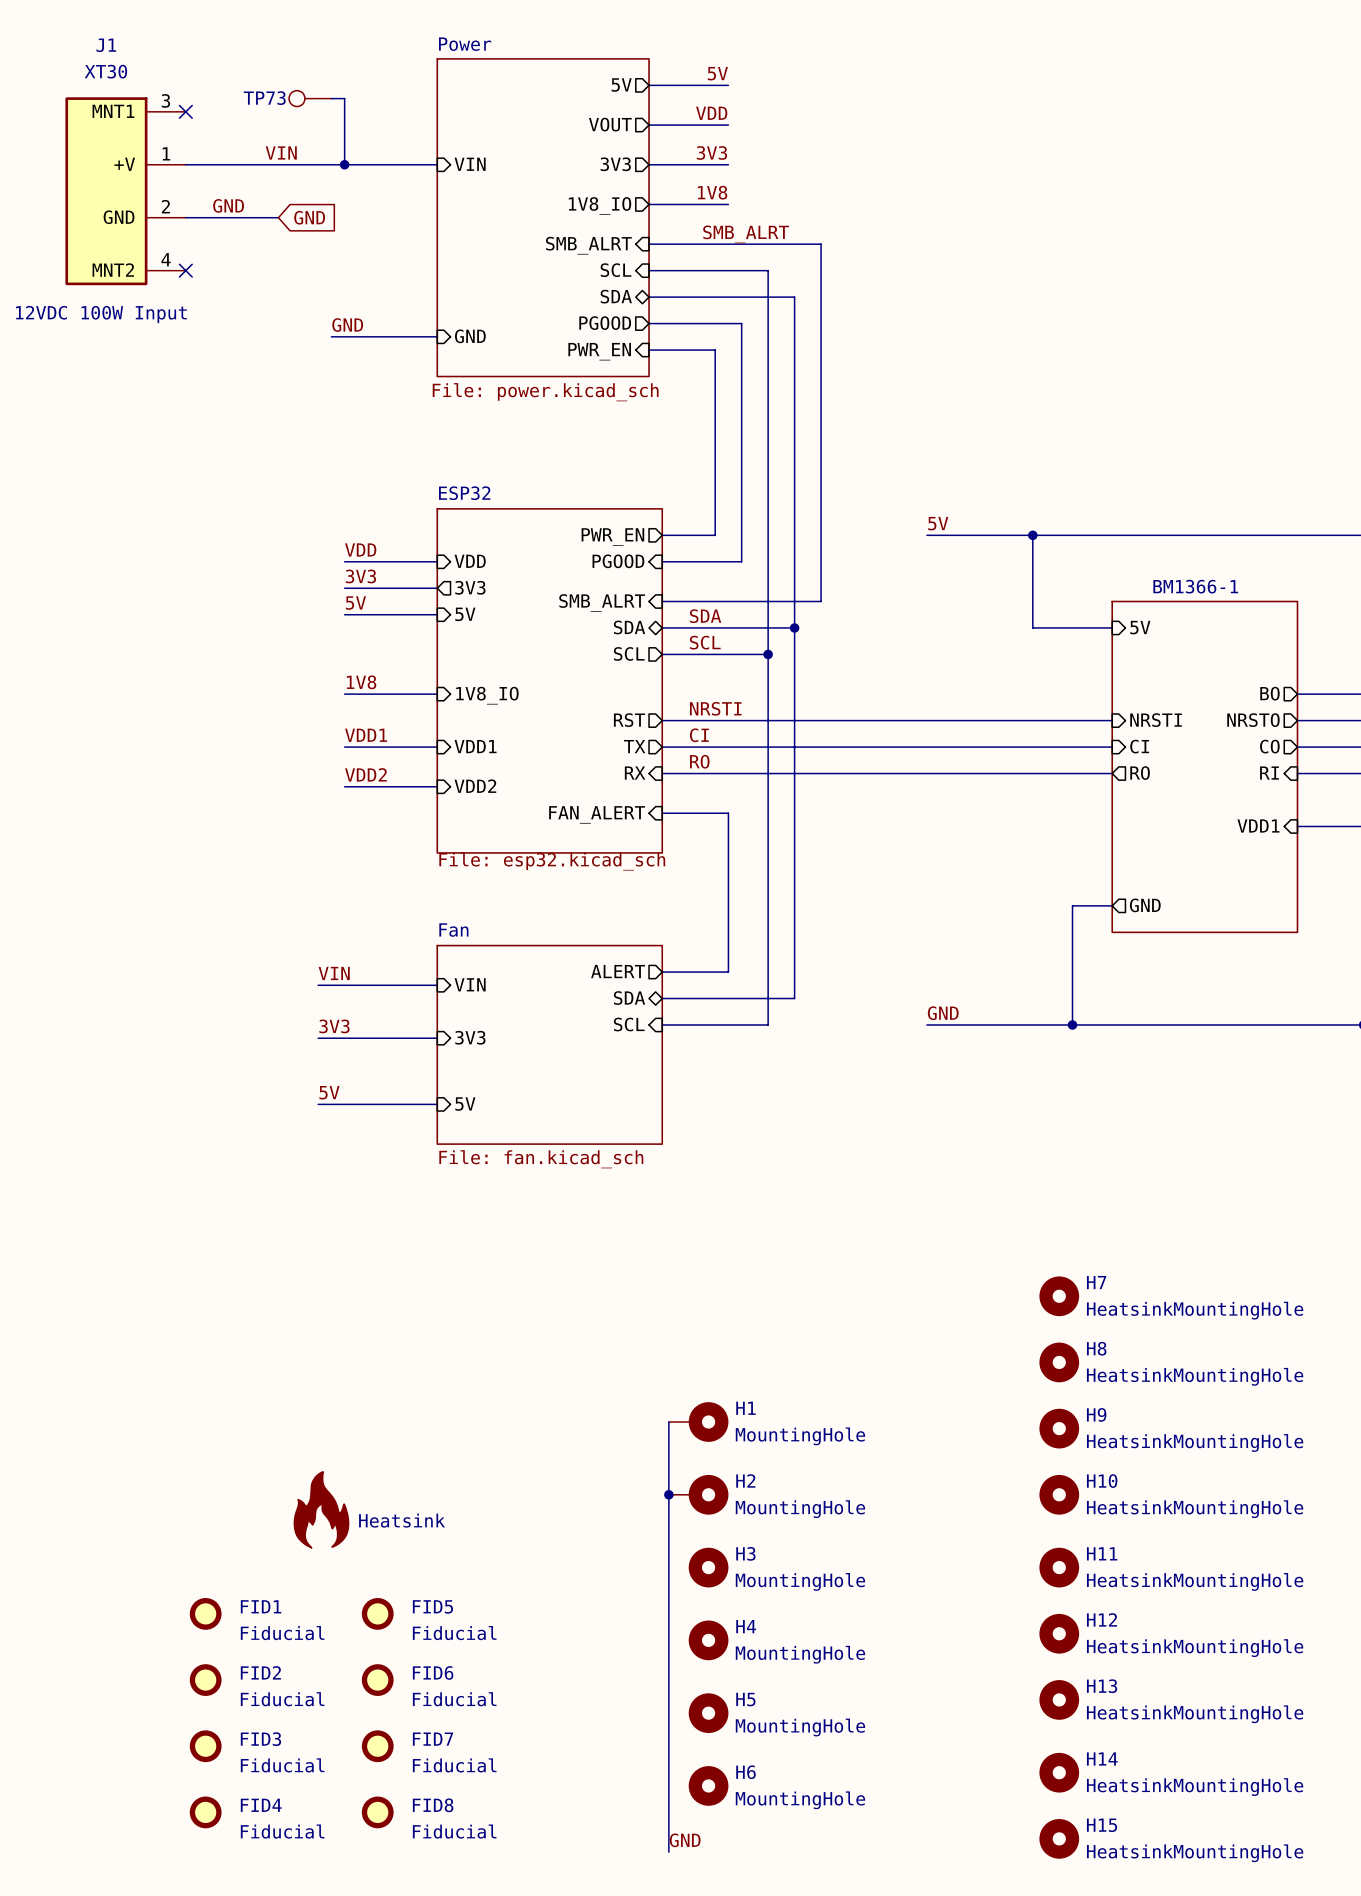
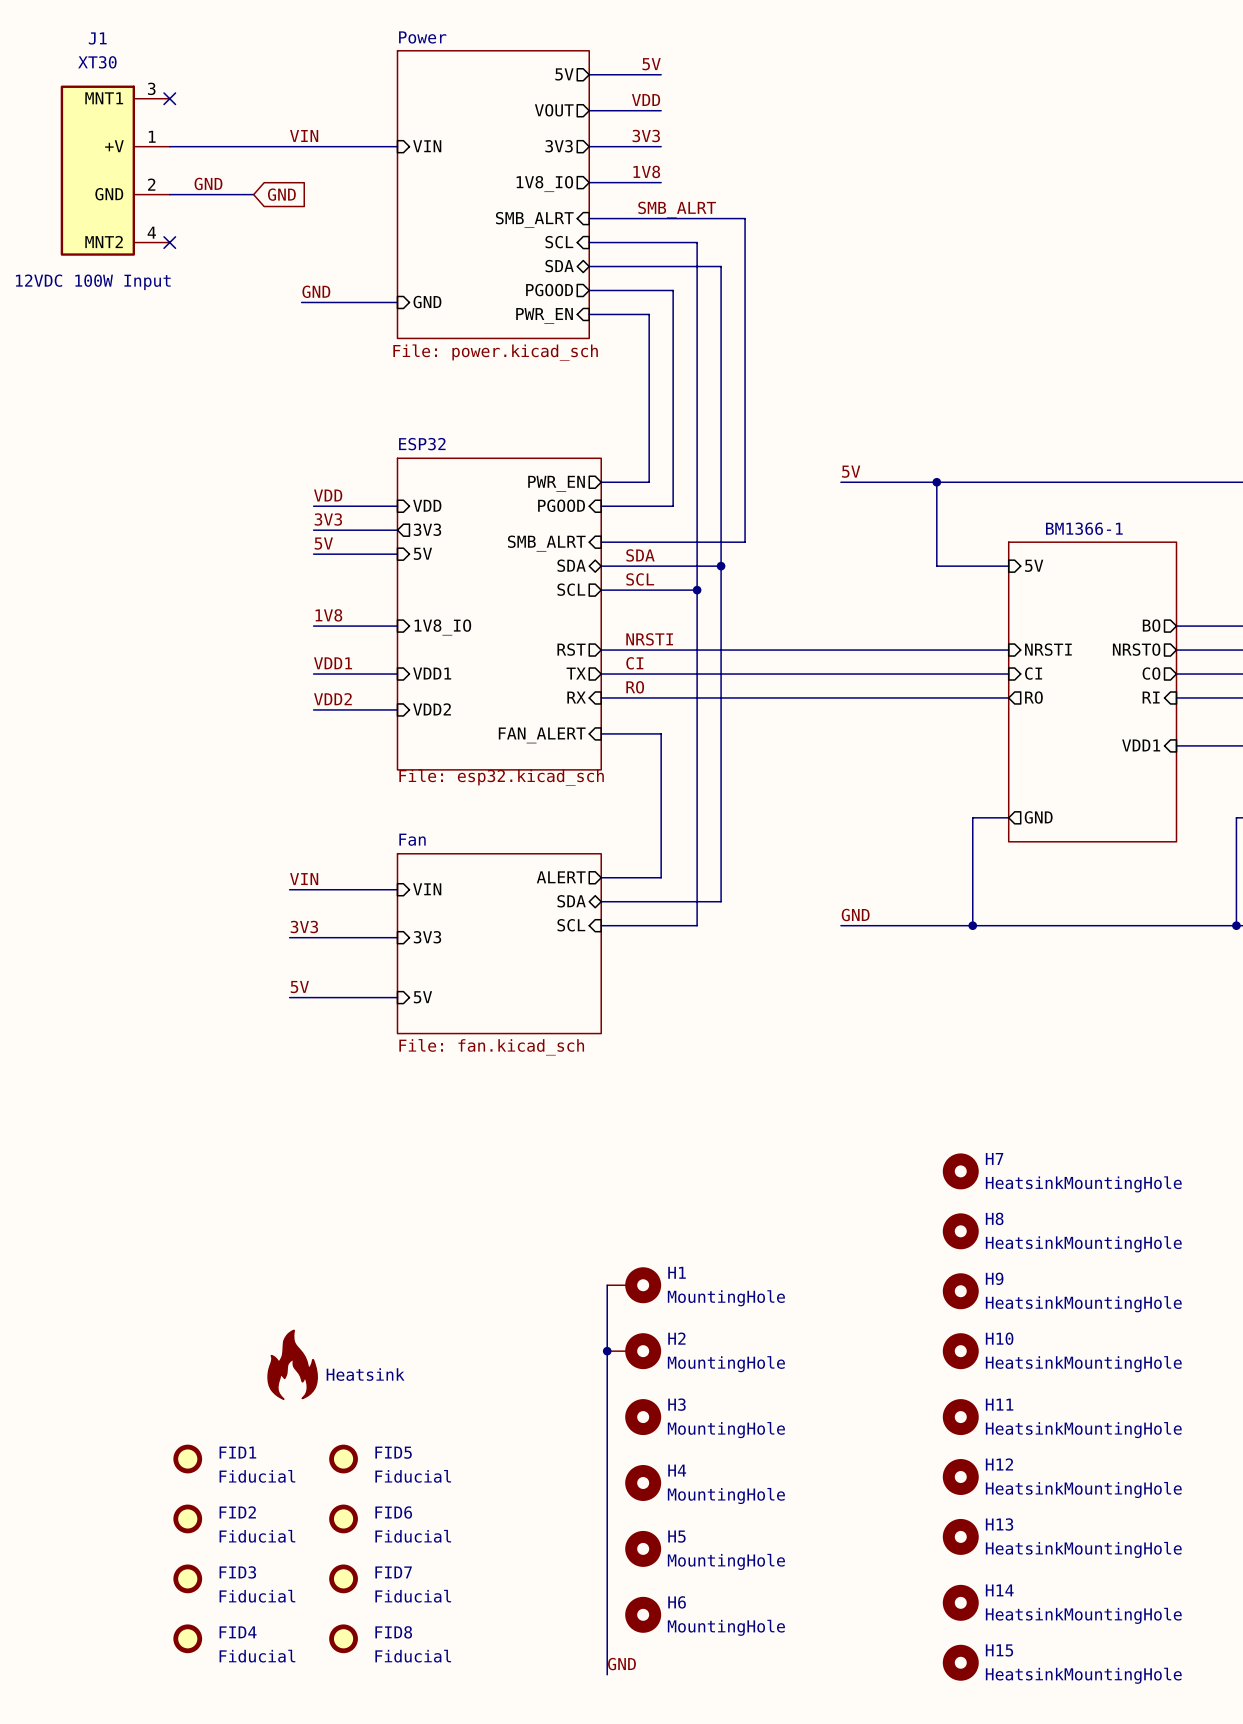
TP73: (310, 98) -> none
wire: (331, 98) (344, 98) (344, 164) -> none
label position: VIN (281, 152) -> VIN (304, 135)
junction: (344, 164) -> none

